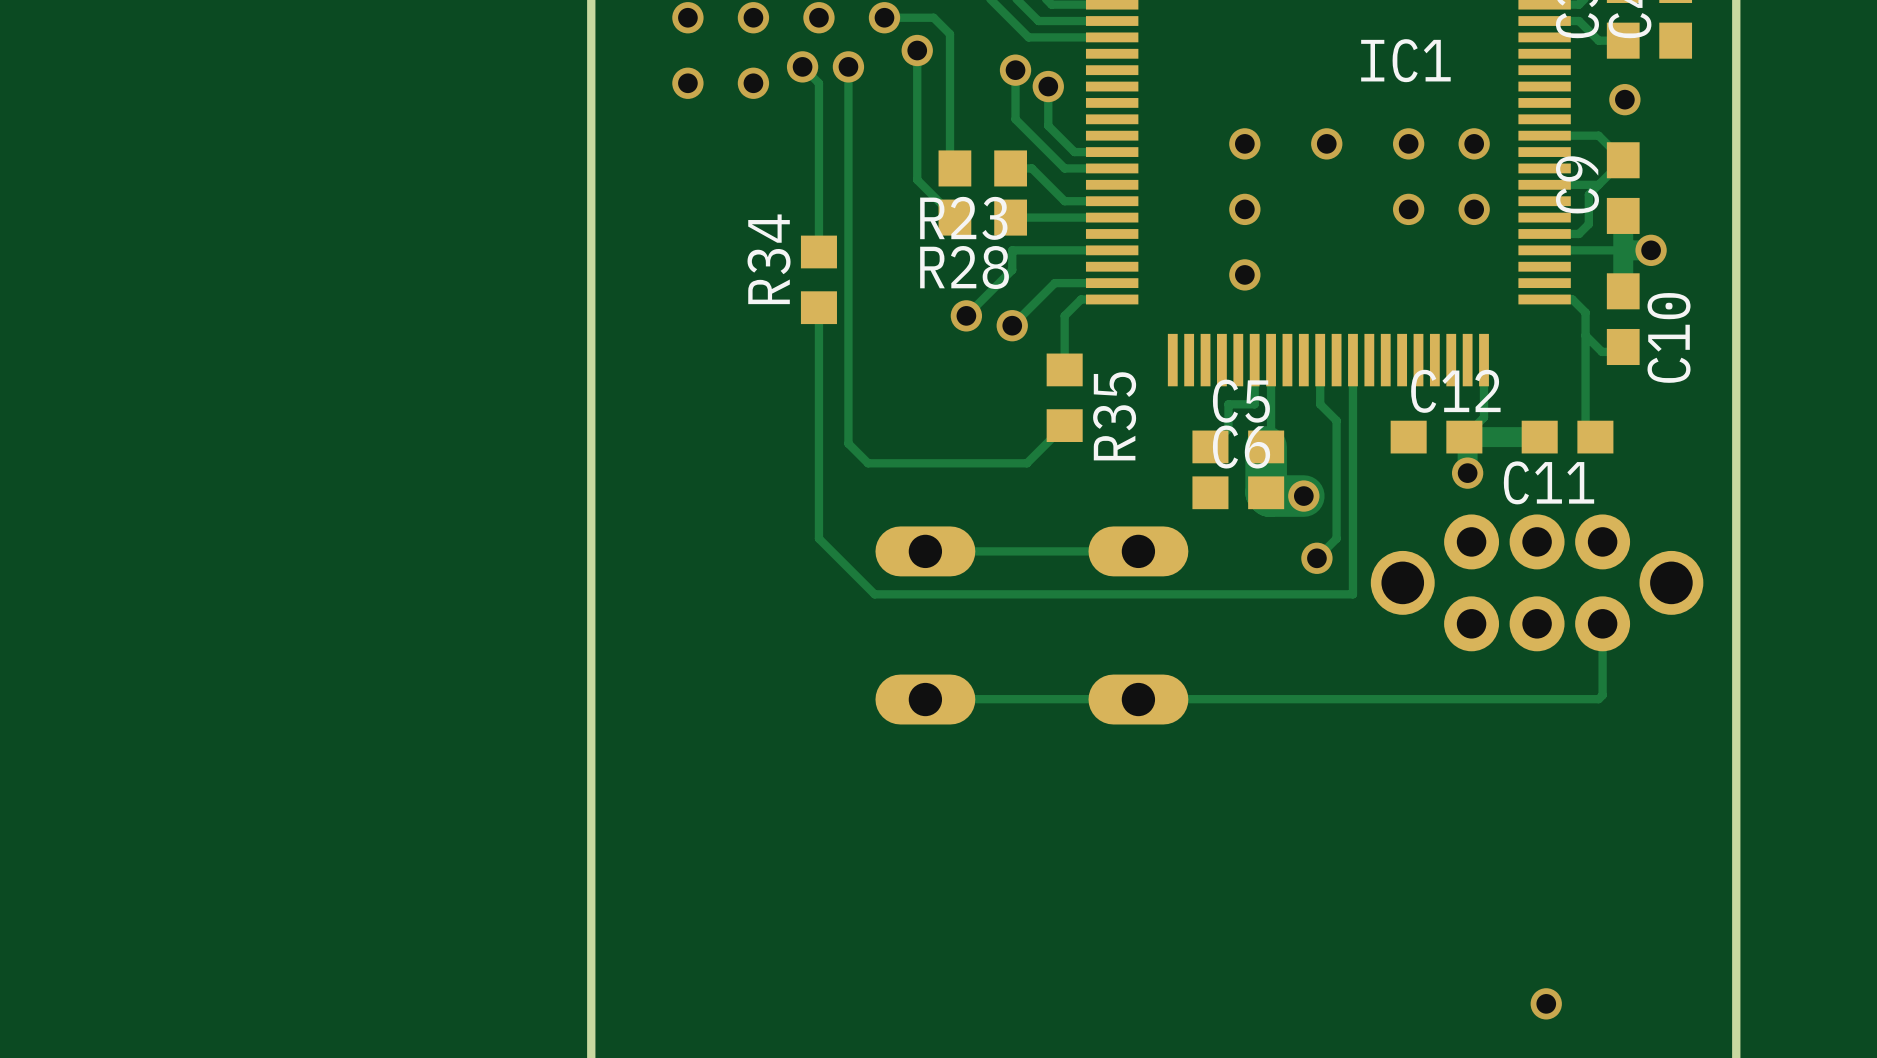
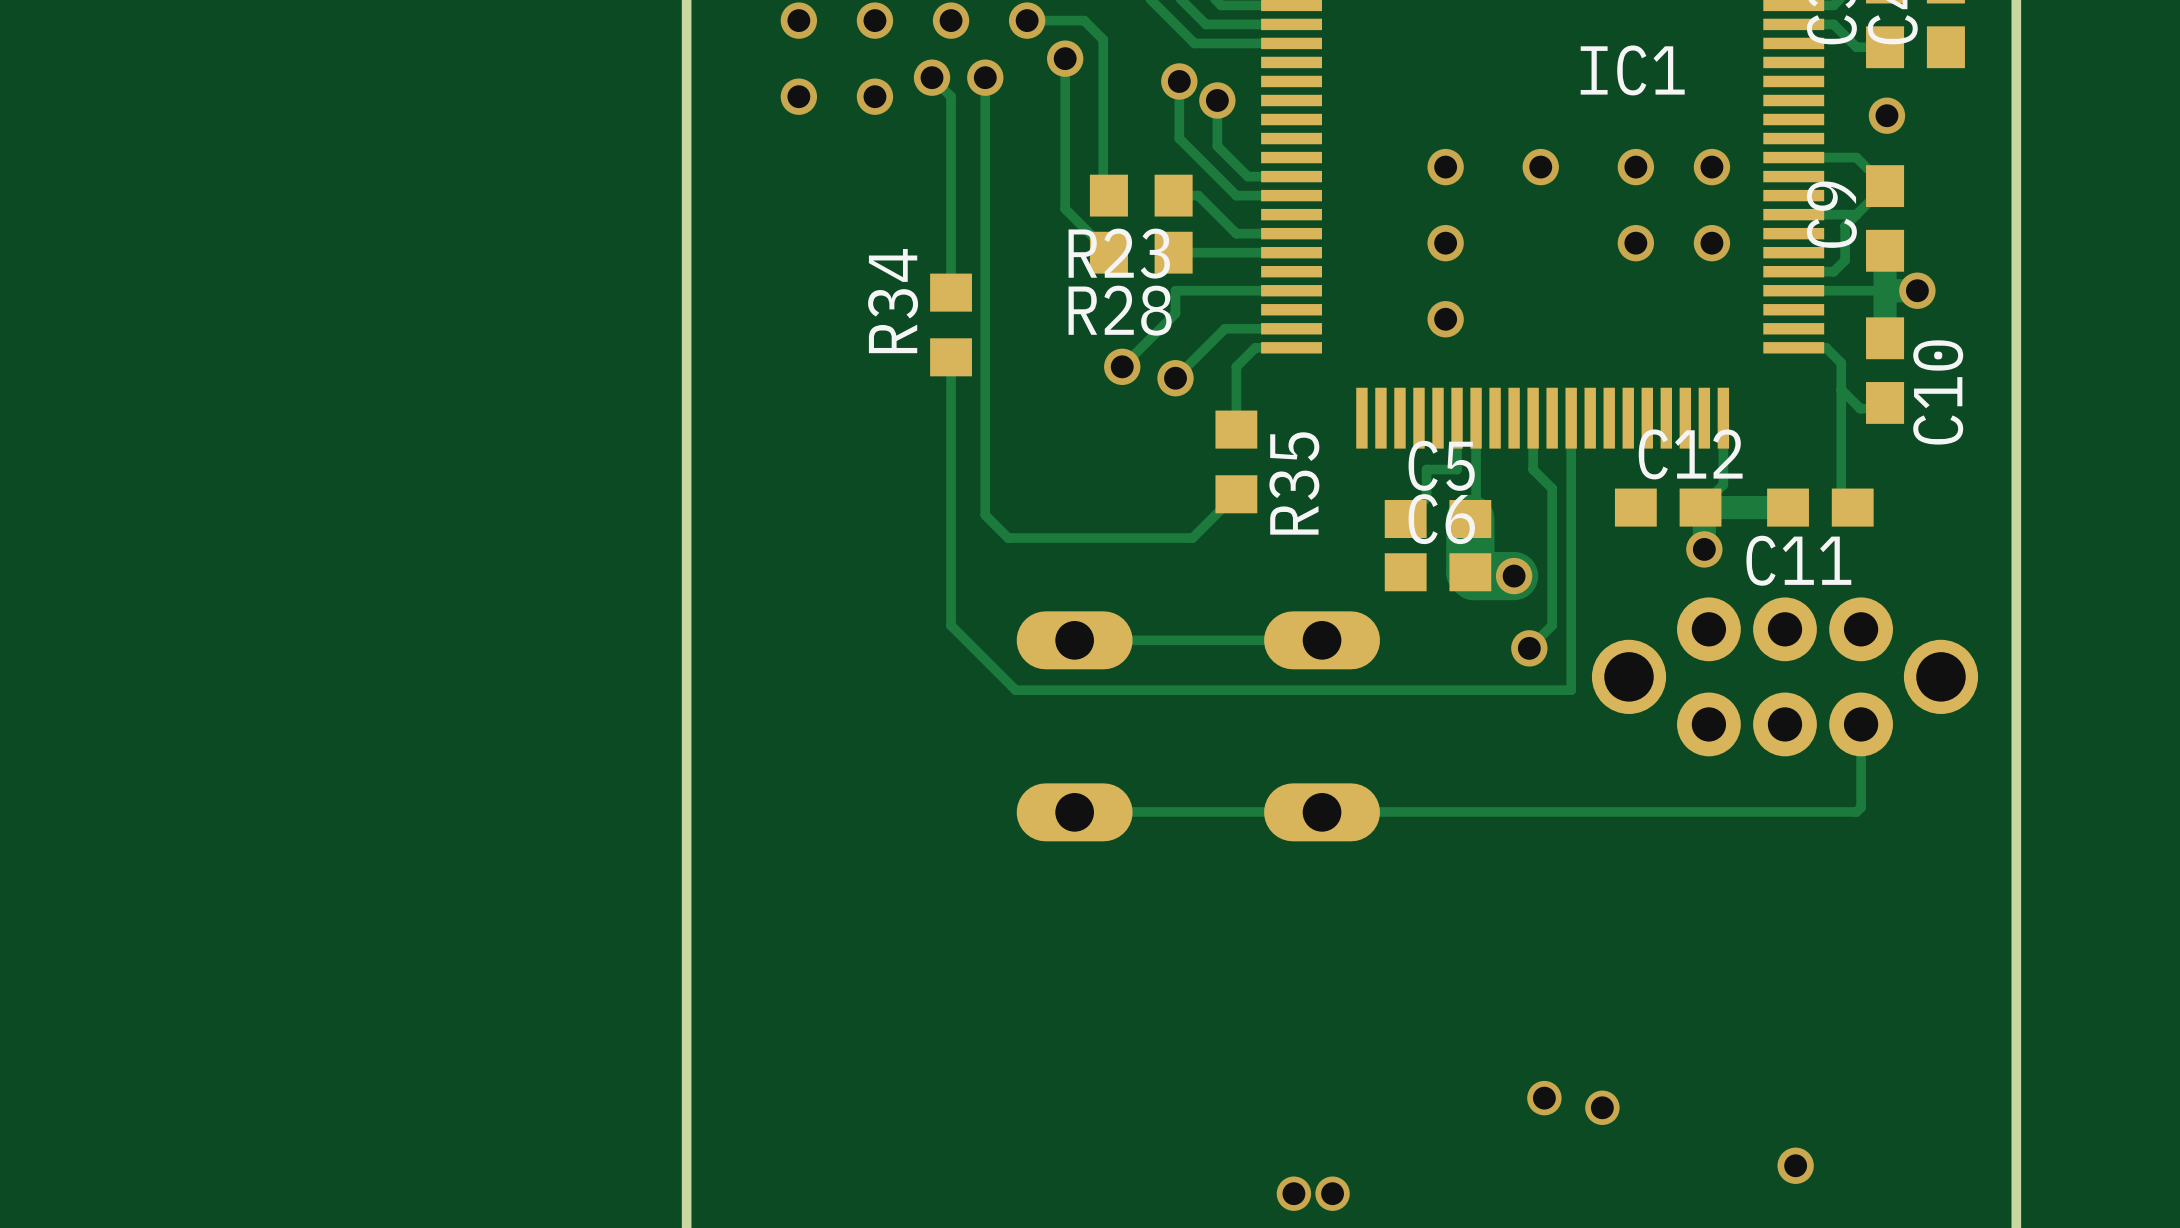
via: none -> (1544, 1098)
via: none -> (1602, 1107)
via: none -> (1293, 1193)
via: none -> (1332, 1193)

